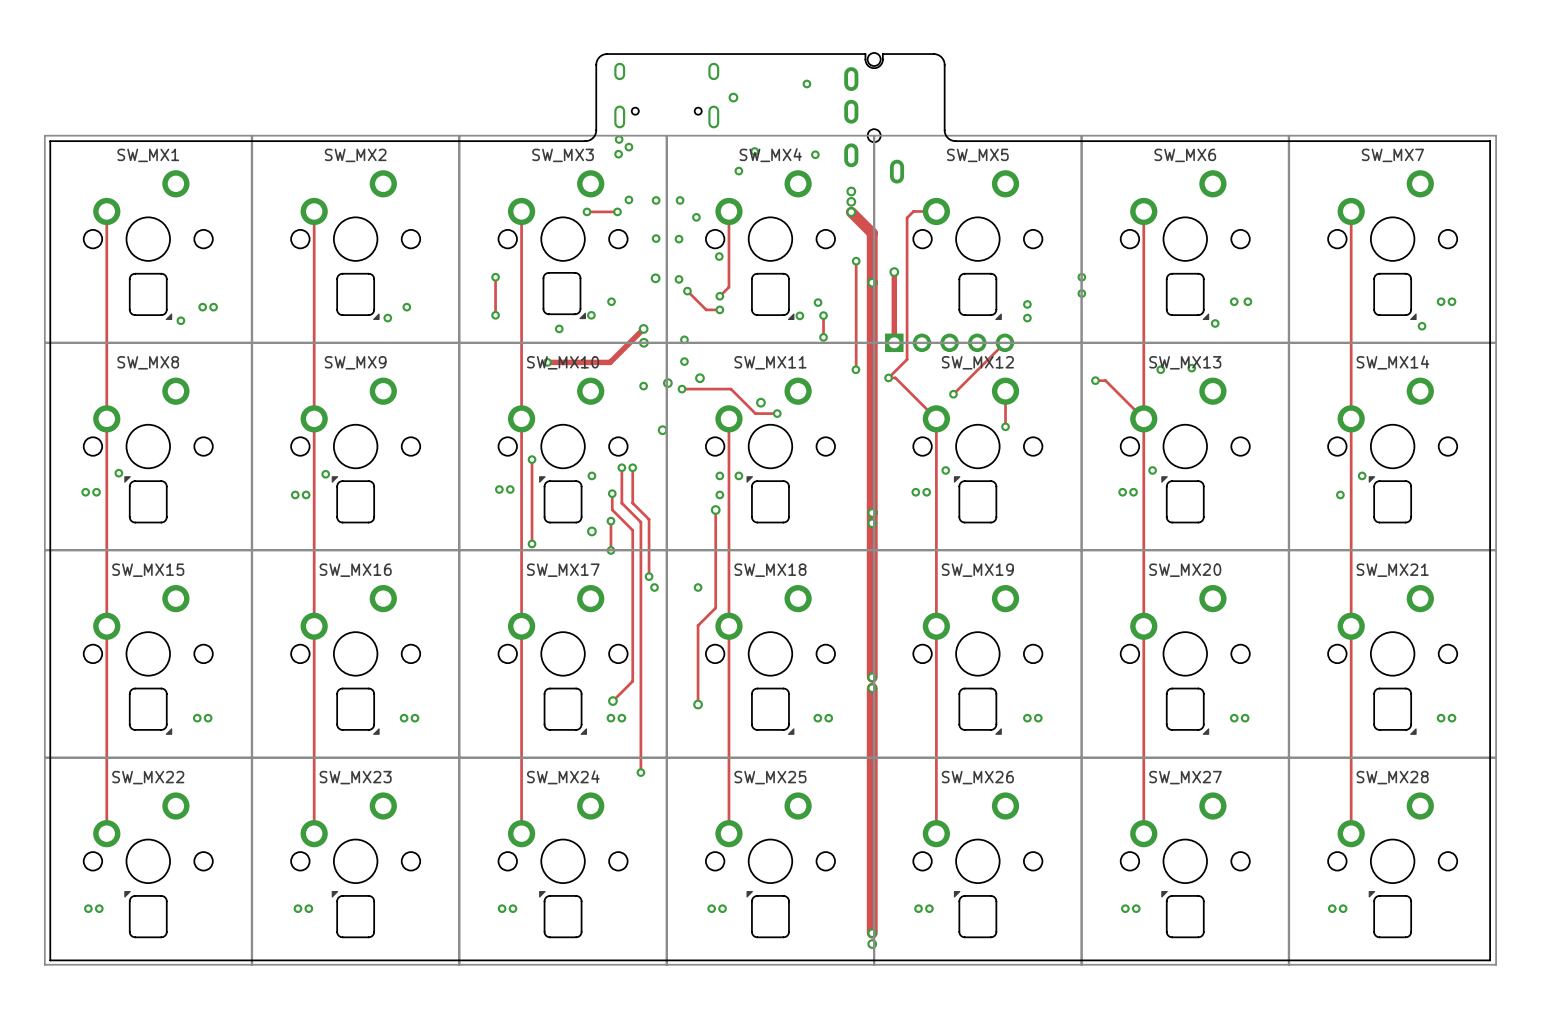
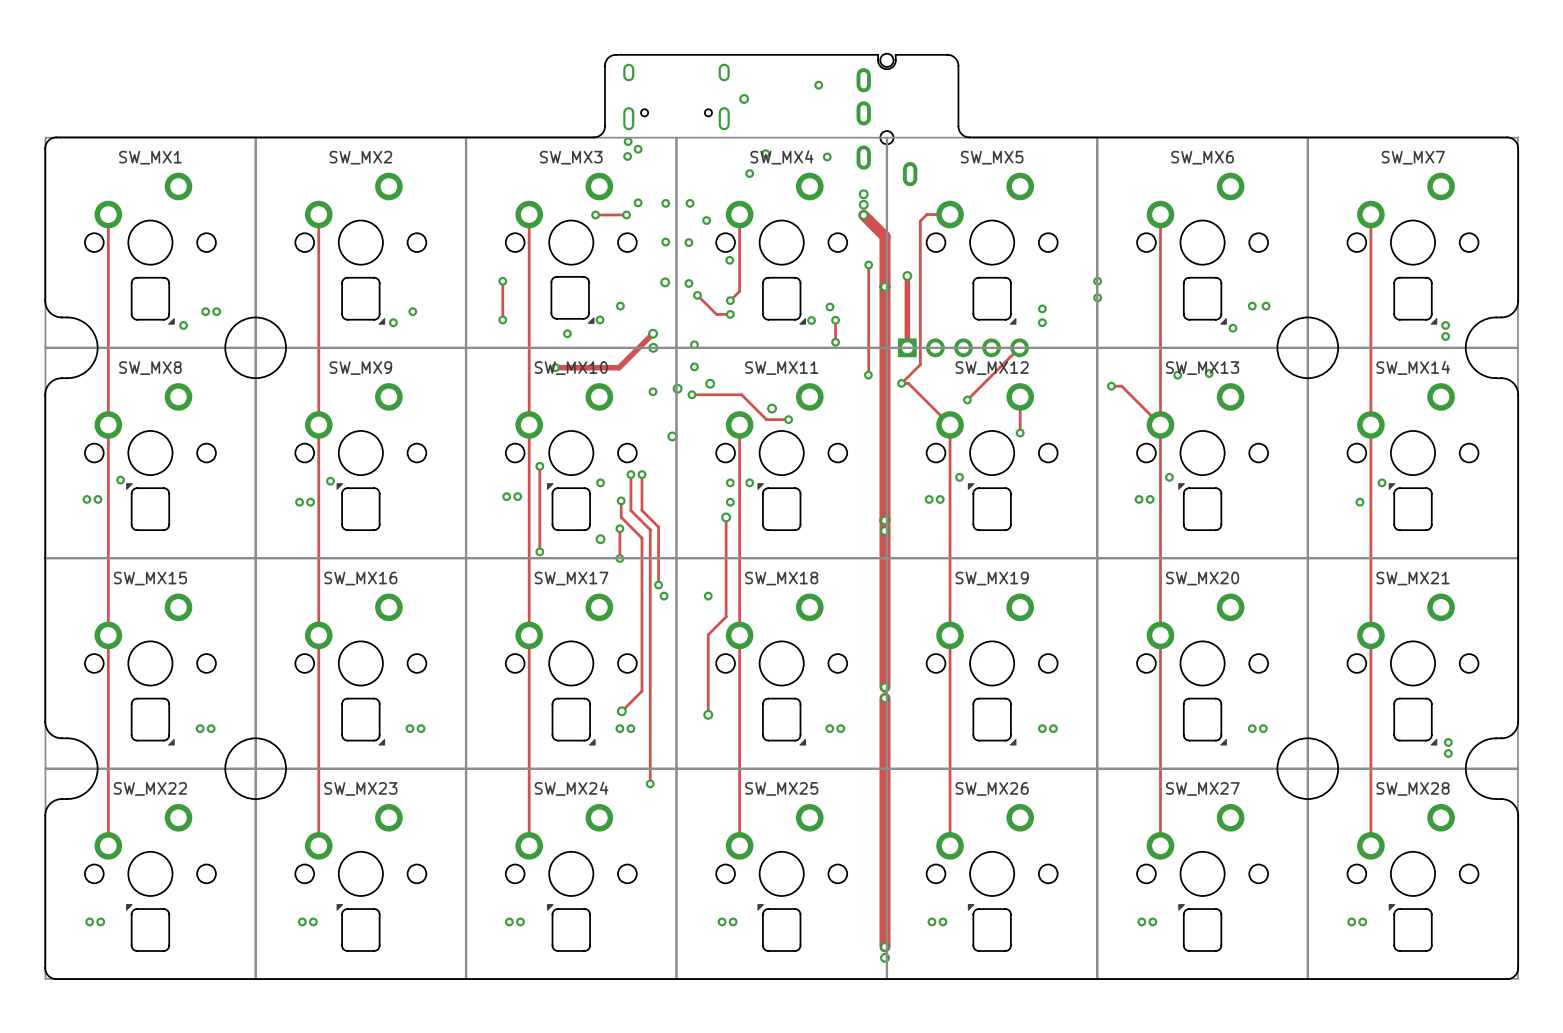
board edge: (596, 124) (594, 135) (585, 141) (50, 141) (50, 960) (1490, 960) (1490, 141) (955, 141) (946, 135) (944, 124) -> (1496, 378) (1484, 375) (1474, 369) (1468, 359) (1465, 347) (1468, 336) (1477, 323) (1488, 318) (1507, 316) (1513, 312) (1517, 305) (1518, 148) (1515, 141) (1511, 138) (969, 137) (961, 134) (958, 126)
board edge: none -> (604, 126) (601, 134) (593, 137) (56, 137) (48, 140) (45, 148) (45, 305) (50, 312) (55, 316) (75, 318) (85, 323) (93, 332) (97, 347) (93, 363) (85, 371) (75, 377) (53, 380) (47, 386) (45, 392) (45, 721) (46, 728) (51, 734) (57, 737) (67, 738)
via: (1441, 301) -> none
via: (1451, 301) -> none
round board edge: none -> [224, 316, 287, 379]
round board edge: none -> [1276, 316, 1339, 379]
via: none -> (1445, 325)
via: (1422, 326) -> none
via: none -> (1445, 336)
board edge: none -> (1496, 378) (1505, 378) (1511, 381) (1516, 388) (1518, 394) (1518, 723) (1514, 731) (1509, 736) (1488, 739) (1477, 744) (1469, 753) (1465, 768) (1469, 783) (1477, 792) (1488, 798) (1507, 800) (1514, 805) (1517, 811) (1518, 968) (1515, 974) (1510, 978) (54, 979) (48, 975) (45, 968) (45, 811) (48, 805) (55, 800) (75, 798) (85, 792) (95, 780) (97, 768) (95, 757) (88, 747) (78, 740) (67, 738)
via: (1441, 718) -> none
via: (1451, 718) -> none
round board edge: none -> [224, 737, 287, 800]
round board edge: none -> [1276, 737, 1339, 800]
via: none -> (1448, 742)
via: none -> (1448, 753)

